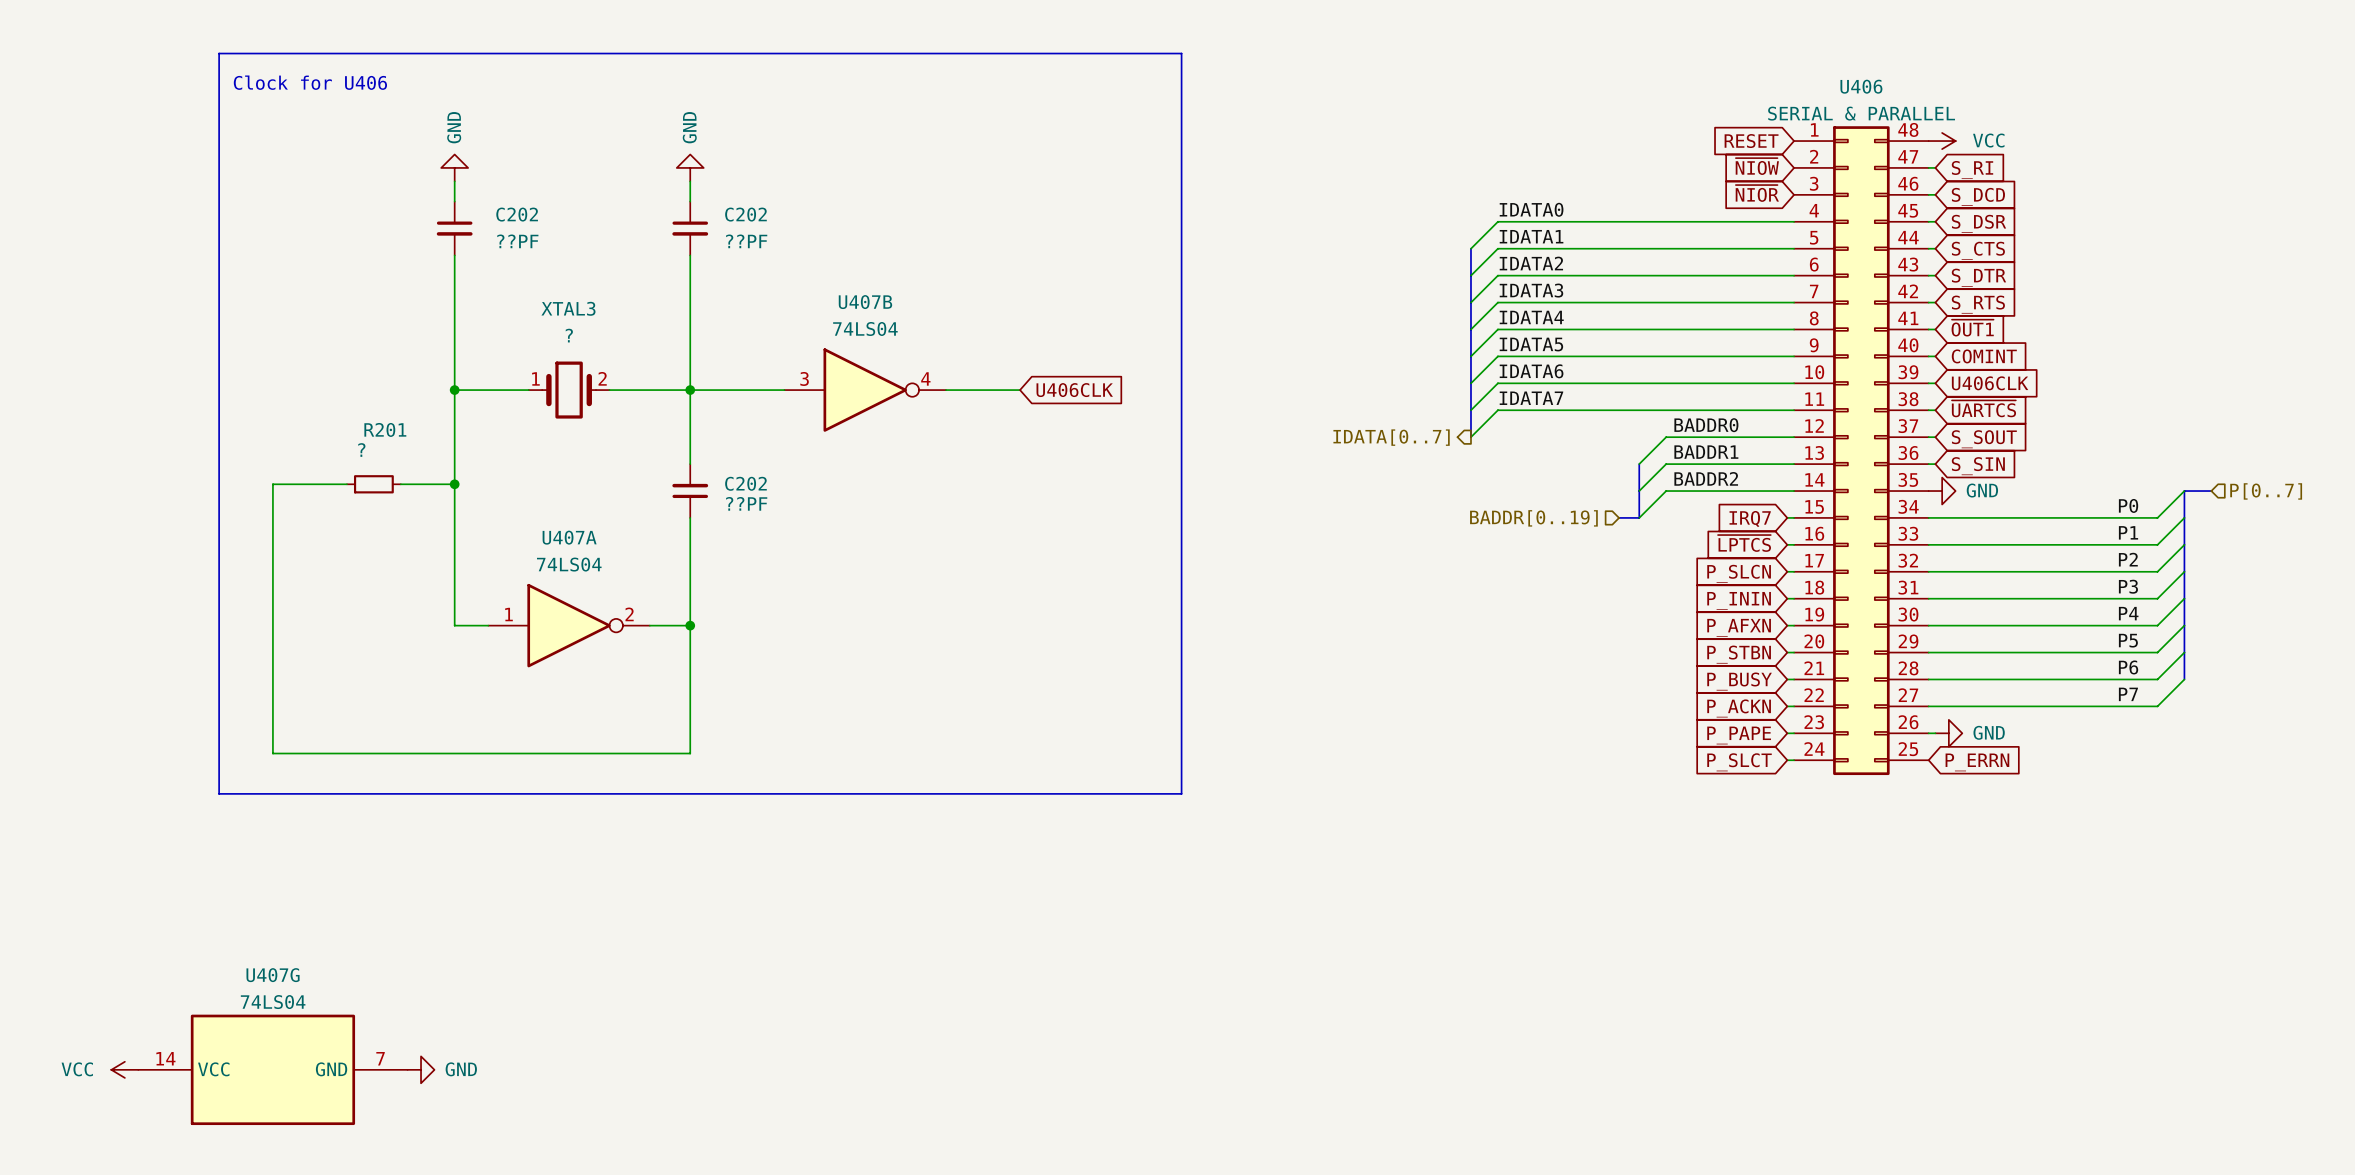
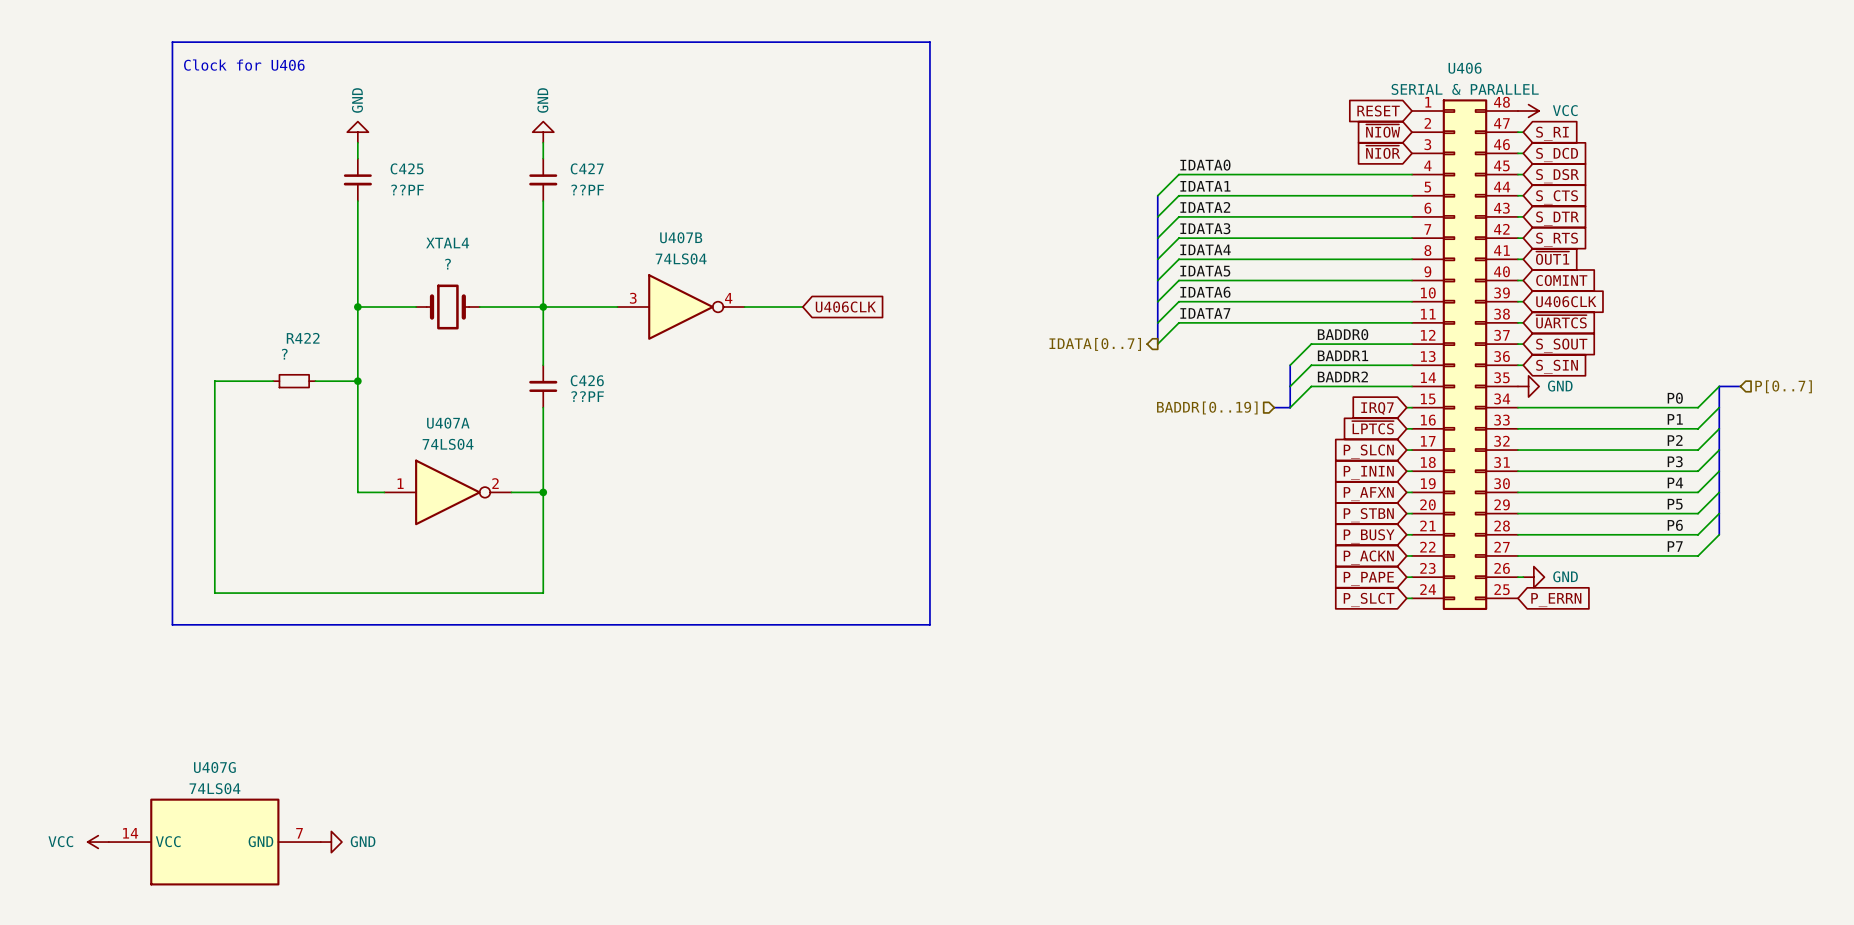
C202 name: C202 (517, 214) -> C425 (407, 168)
C202 name: C202 (745, 214) -> C427 (587, 168)
XTAL3 name: XTAL3 (568, 308) -> XTAL4 (447, 243)
XTAL3 pin number: 1 (535, 378) -> none
XTAL3 pin number: 2 (602, 378) -> none
R201 name: R201 (385, 429) -> R422 (303, 338)
C202 name: C202 (745, 483) -> C426 (587, 380)

